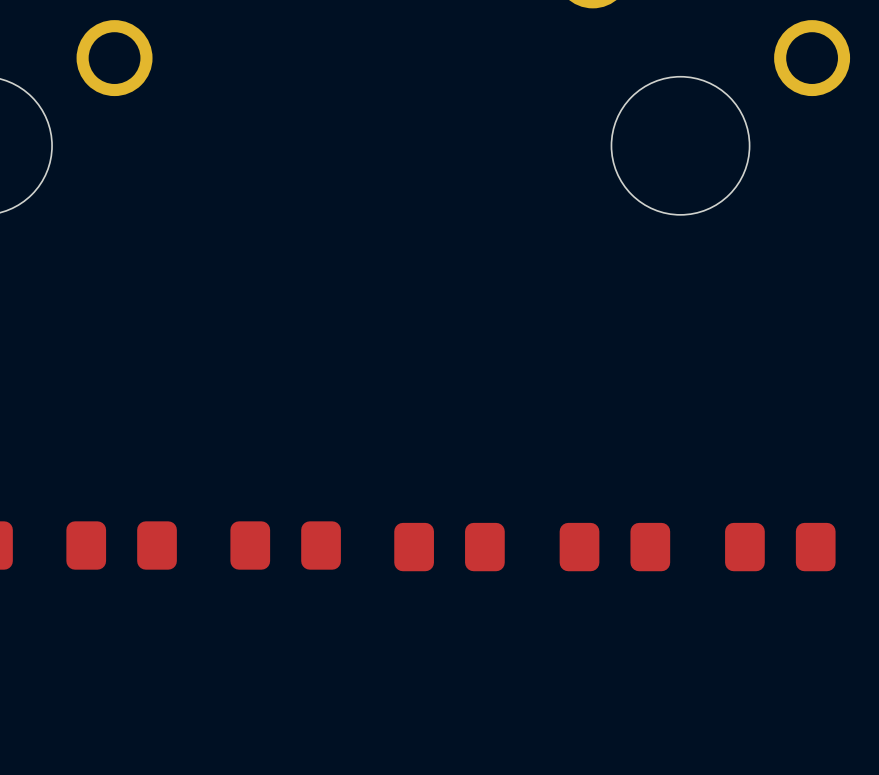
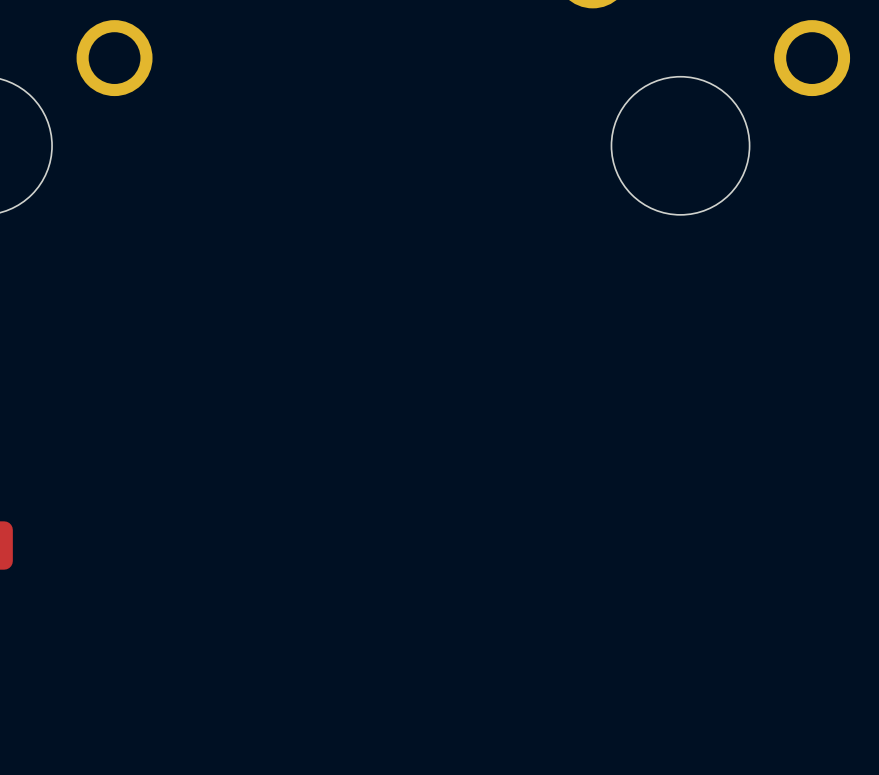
part: (121, 545) -> none
part: (285, 545) -> none
part: (449, 547) -> none
part: (614, 547) -> none
part: (780, 547) -> none

